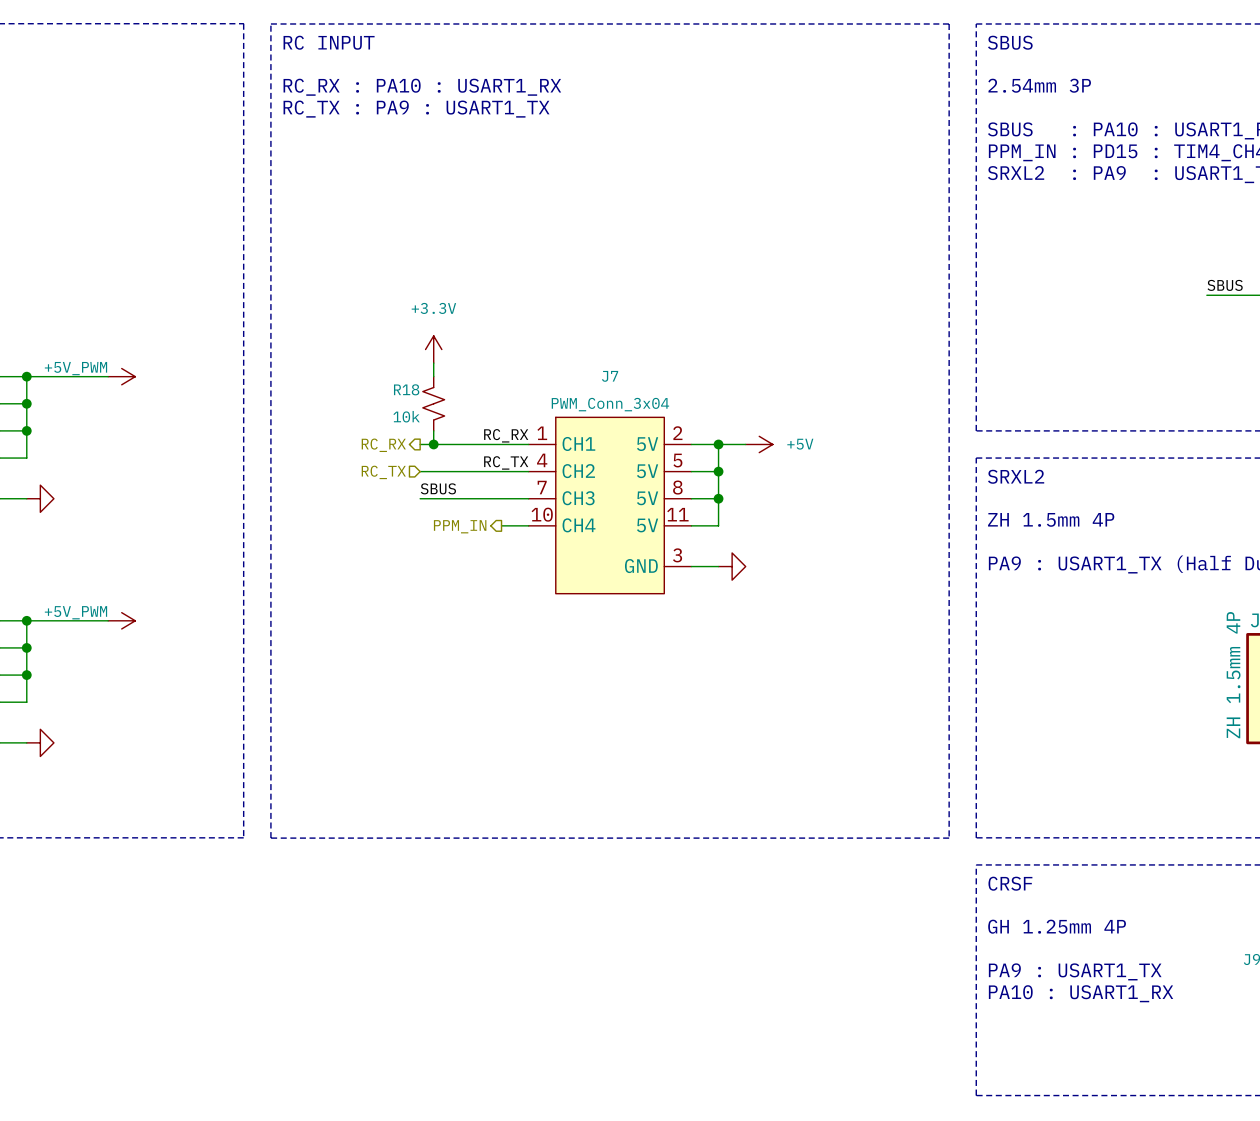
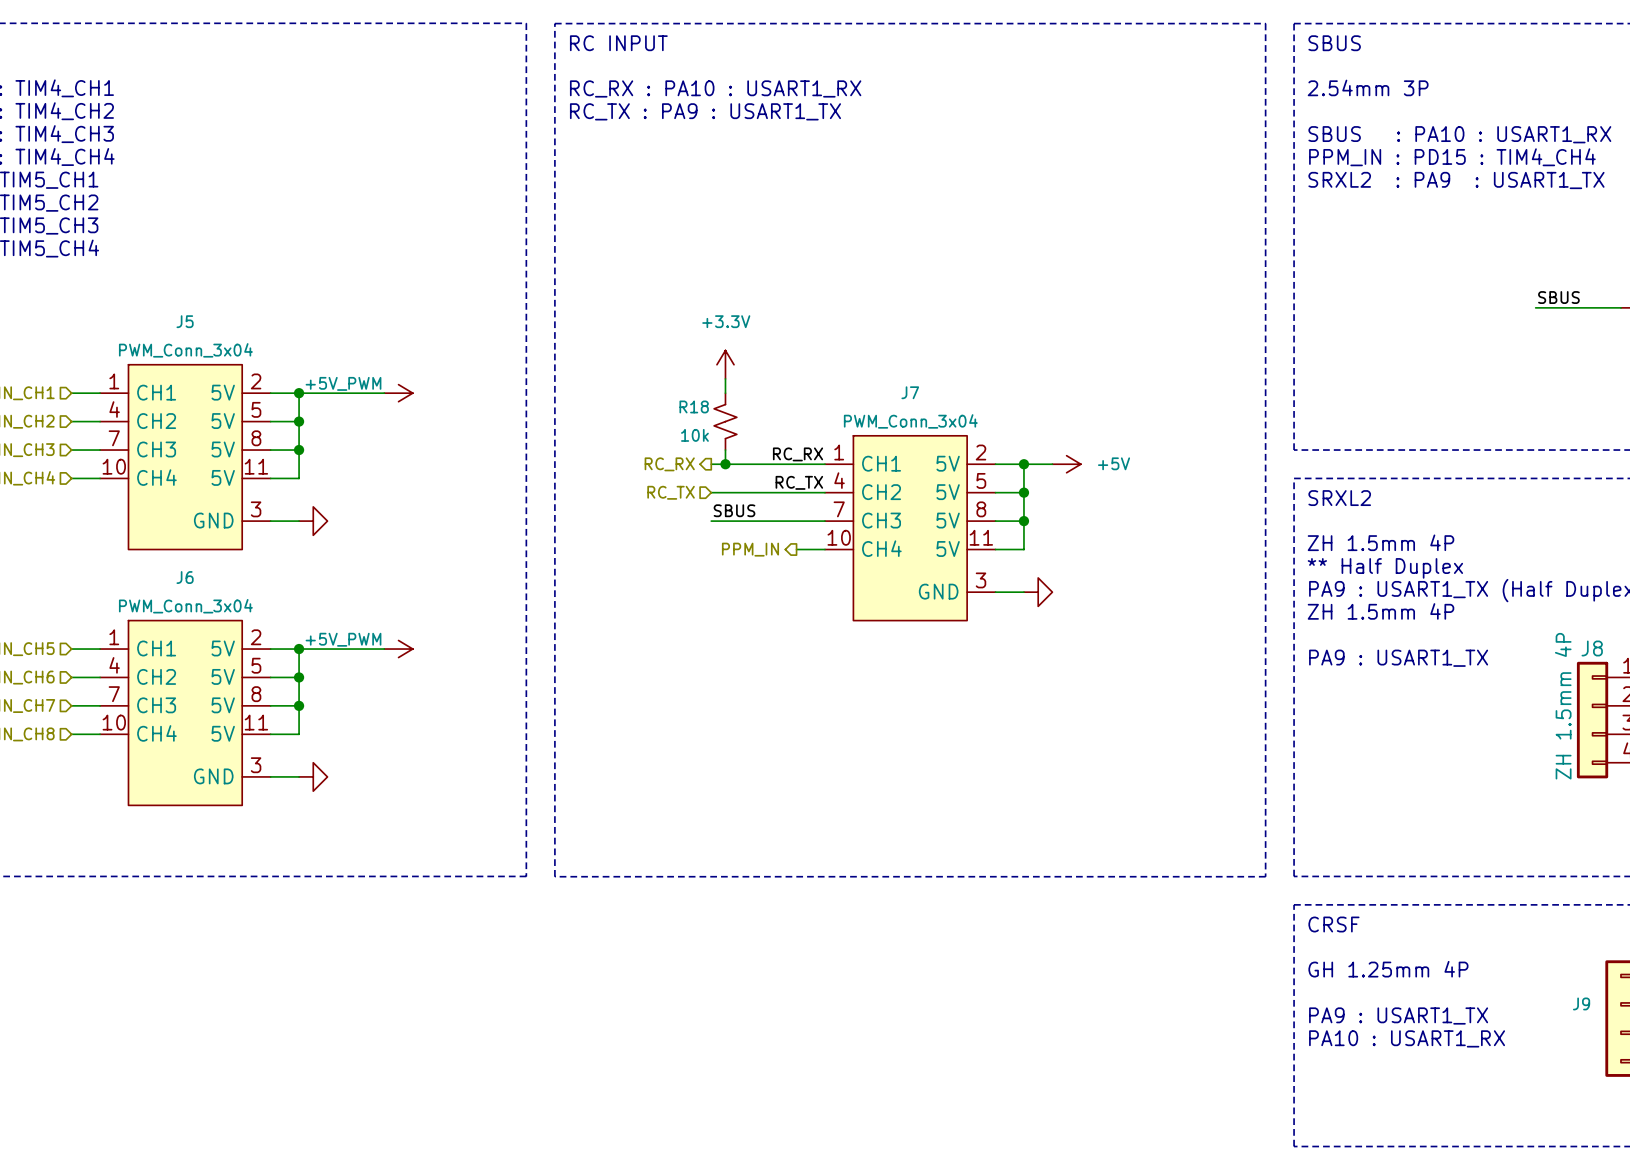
text: none -> ** Half Duplex (1385, 568)
text: none -> ZH 1.5mm 4P (1380, 611)
text: none -> PA9 : USART1_TX (1398, 658)

